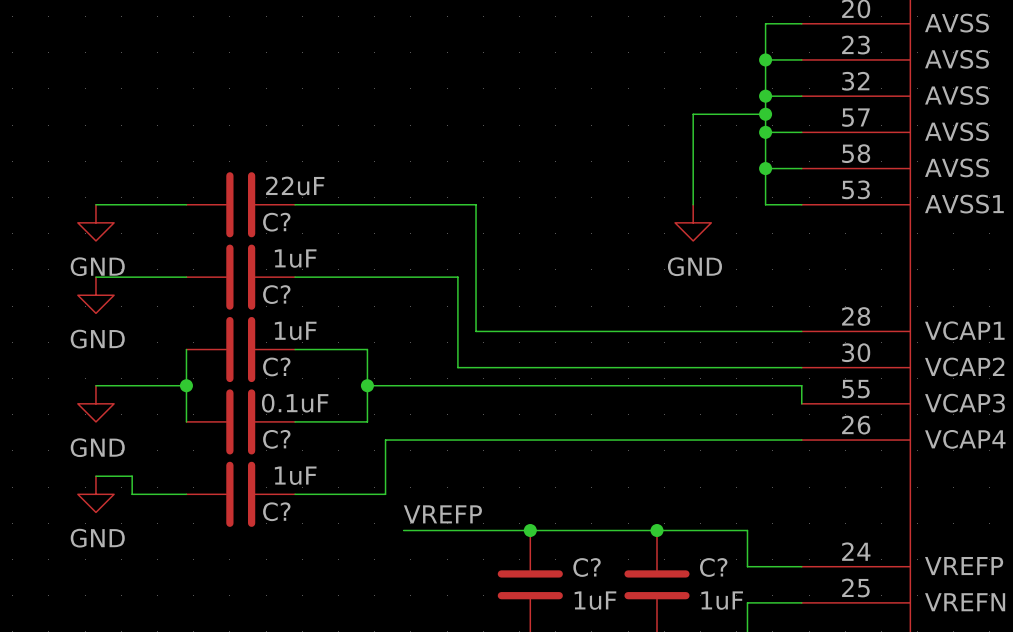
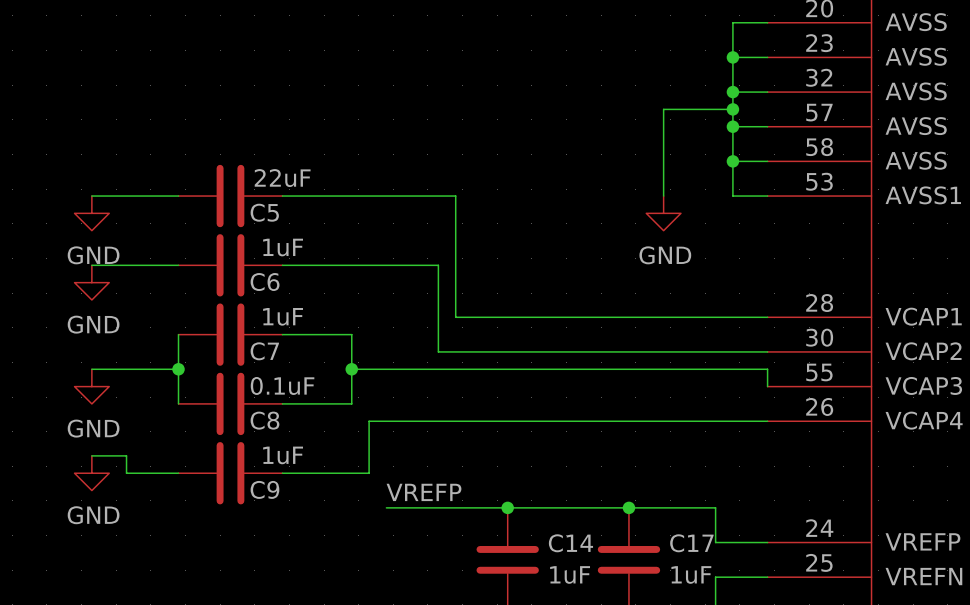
C? name: C? (276, 222) -> C5 (264, 212)
C? name: C? (276, 294) -> C6 (265, 282)
C? name: C? (276, 366) -> C7 (264, 351)
C? name: C? (276, 439) -> C8 (264, 420)
C? name: C? (276, 511) -> C9 (264, 489)
C? name: C? (587, 567) -> C14 (570, 543)
C? name: C? (713, 567) -> C17 (691, 543)

